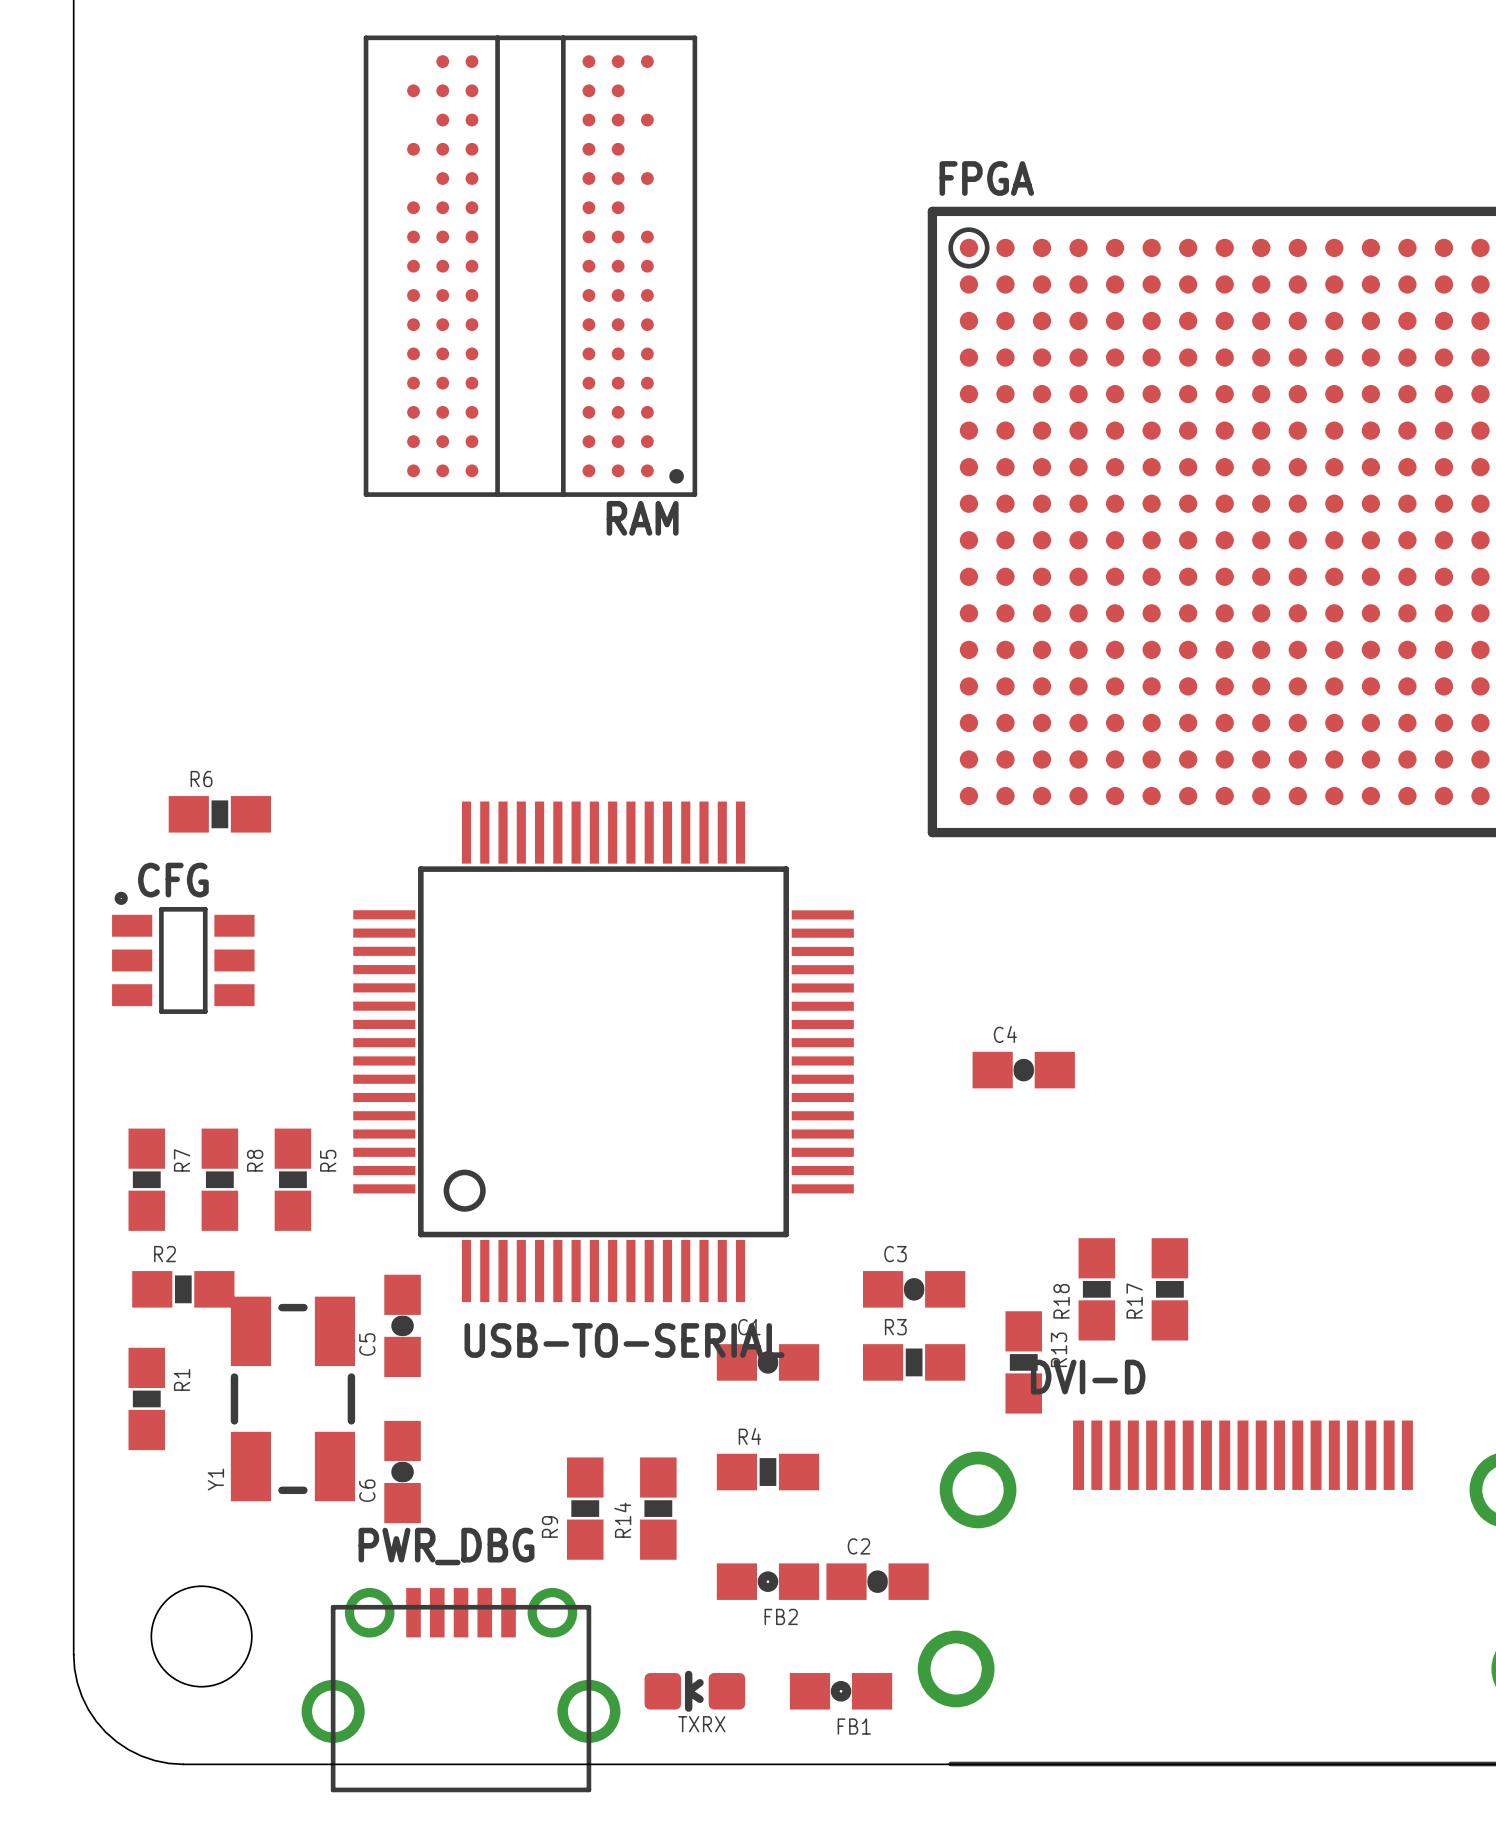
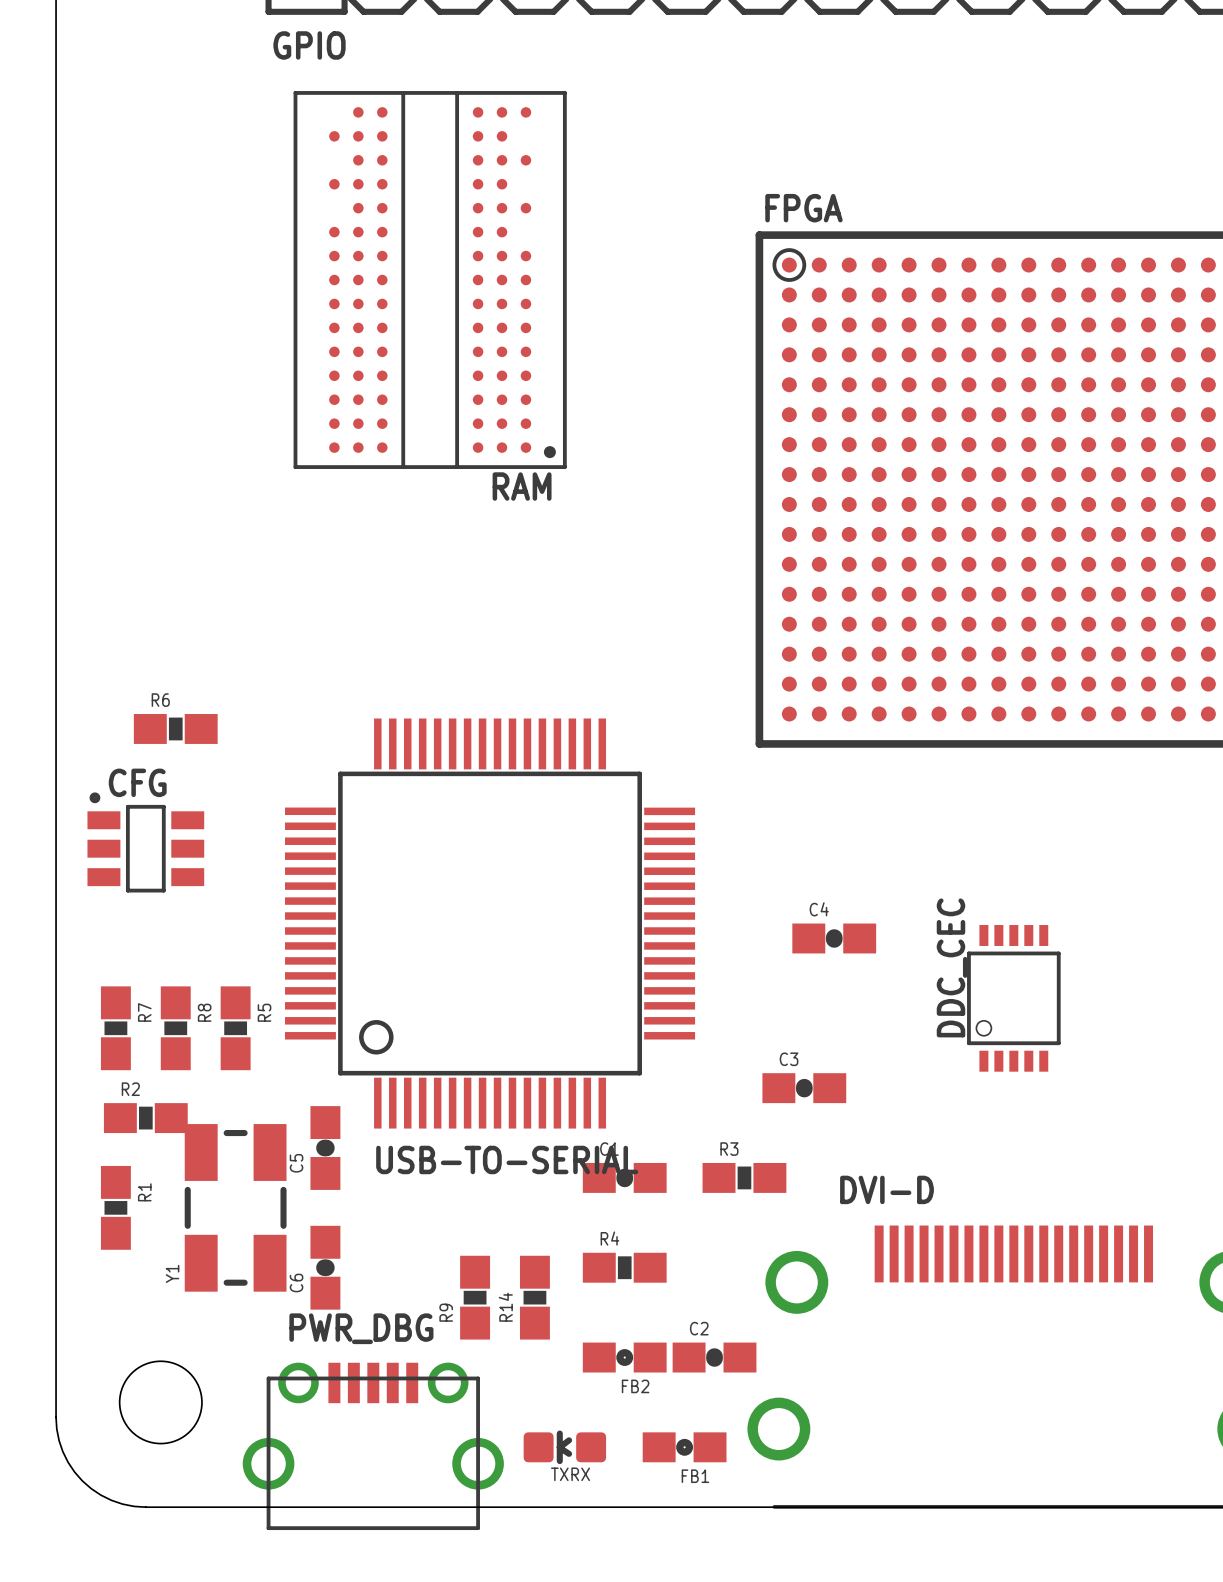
DDC_CEC: none -> (1013, 998)
C3 position: (914, 1289) -> (804, 1088)
R18: (1096, 1289) -> none
R17: (1169, 1289) -> none
R13: (1023, 1362) -> none

